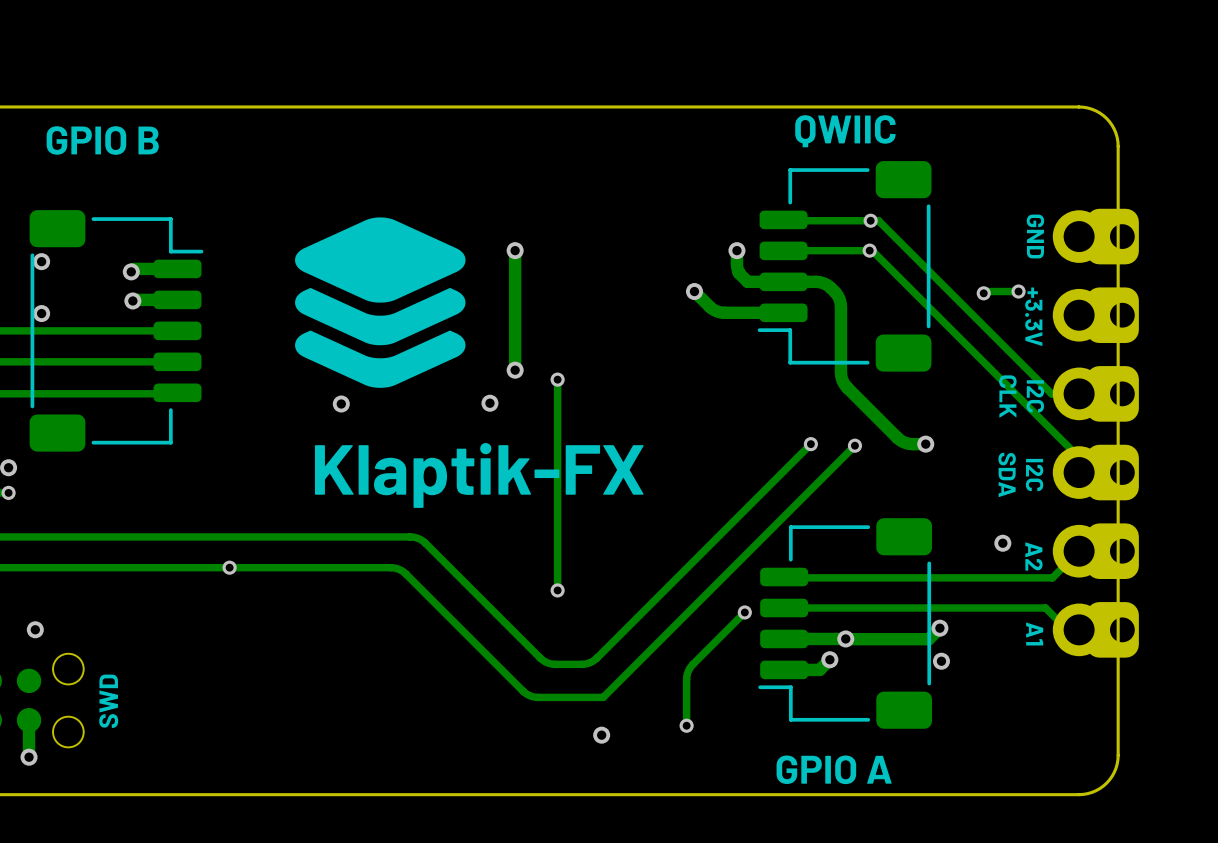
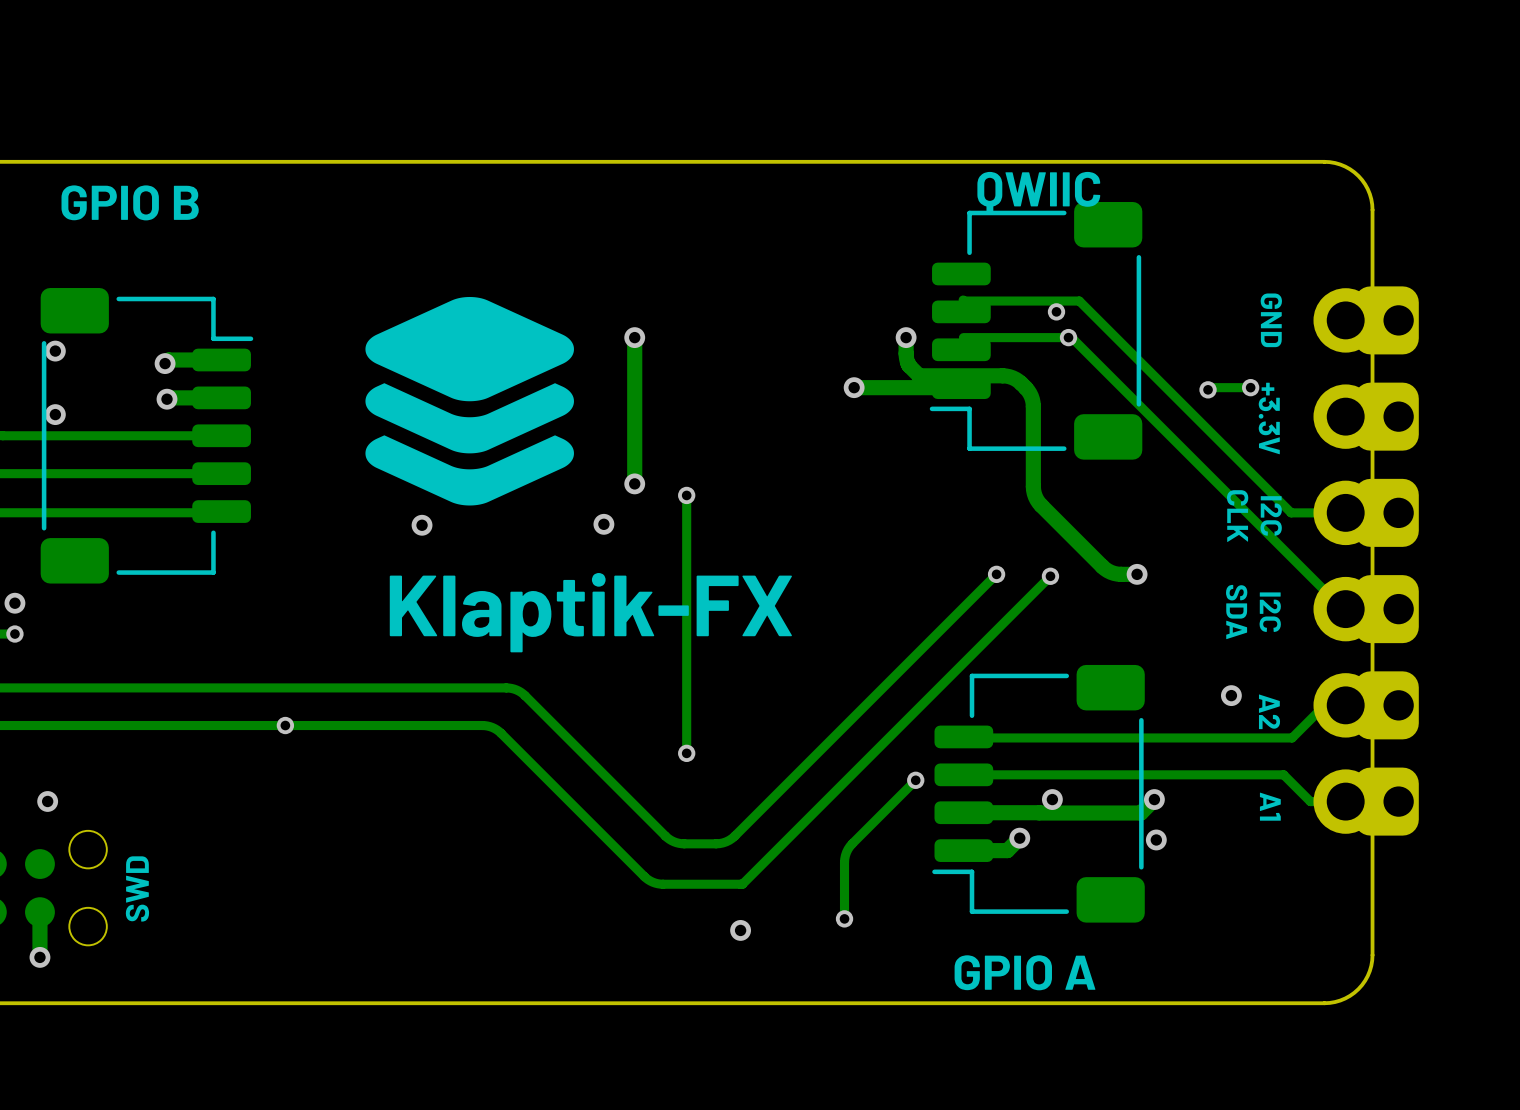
via position: (870, 220) -> (1056, 311)
part position: (844, 266) -> (1036, 330)
track: (694, 291) (710, 307) (720, 312) (783, 312) -> (854, 387) (961, 387)
part position: (1095, 433) -> (1366, 560)
via position: (845, 638) -> (1052, 799)

